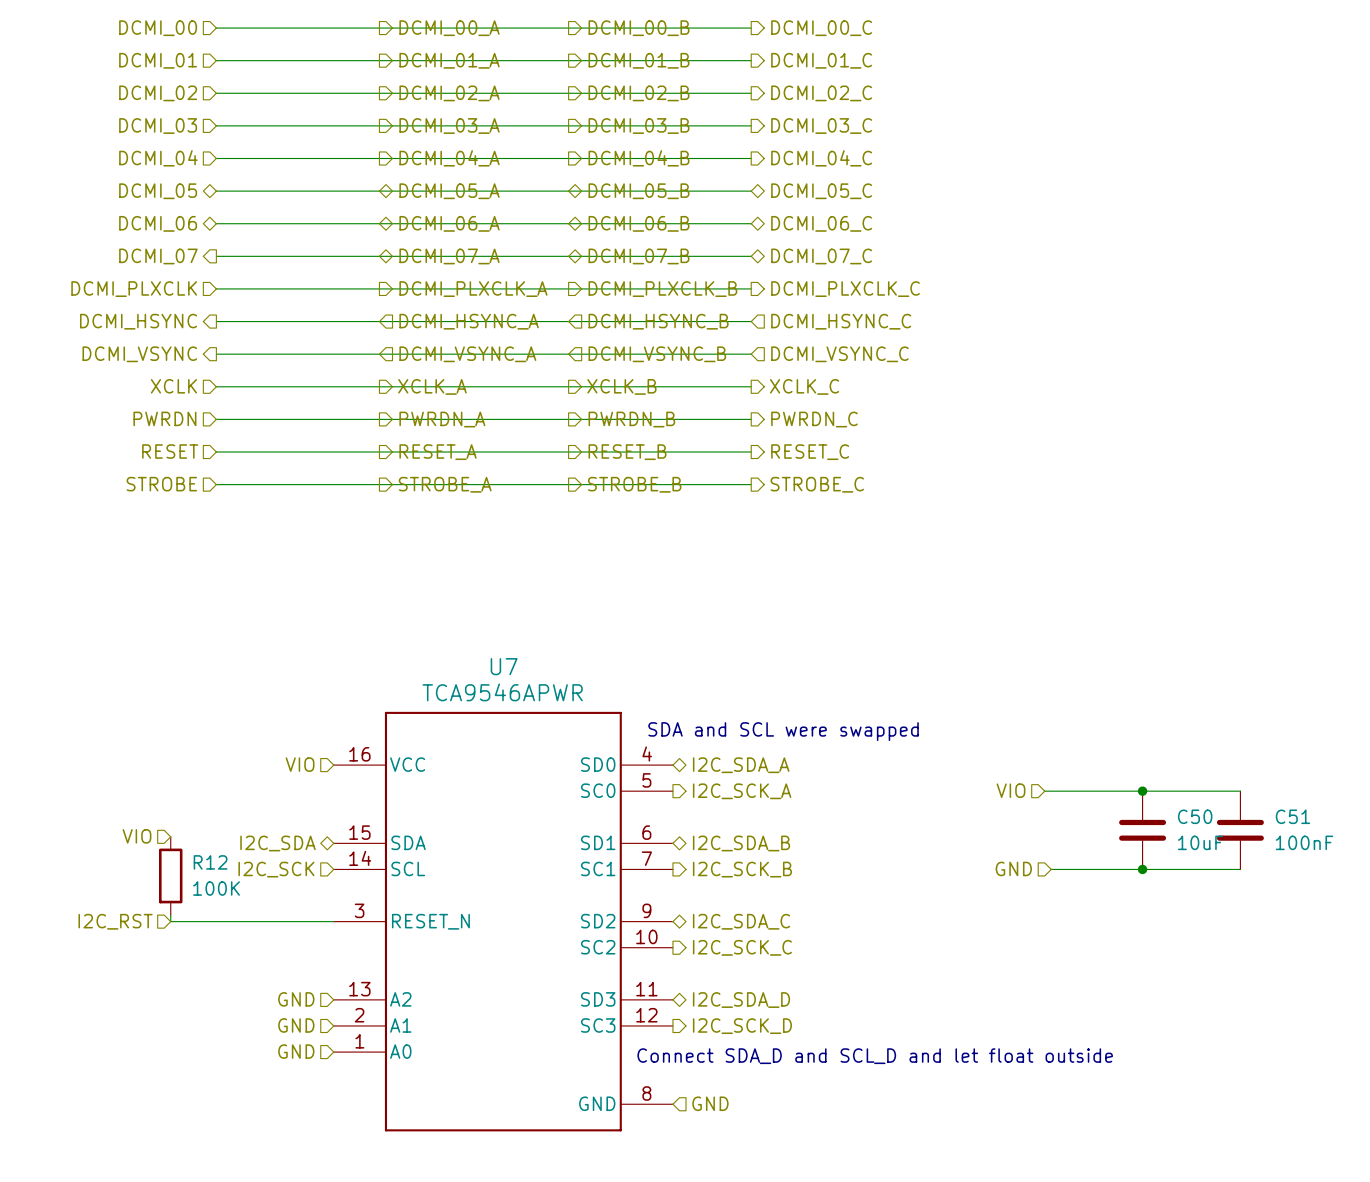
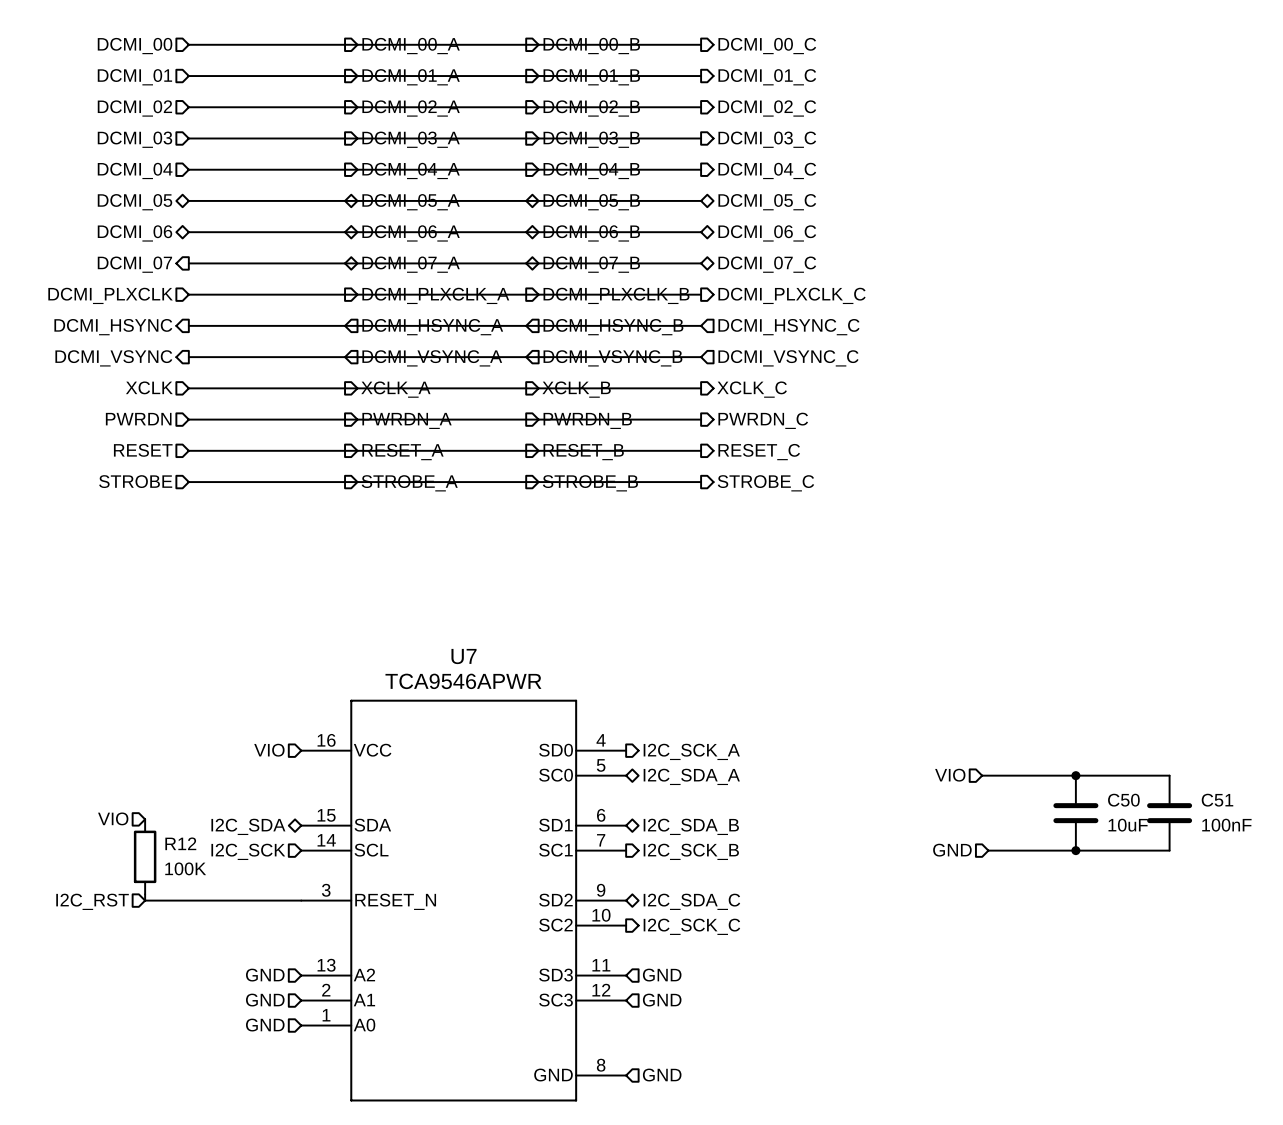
text: SDA and SCL were swapped (783, 731) -> none
hierarchical label shape: bidirectional (741, 765) -> output (691, 751)
hierarchical label: I2C_SDA_A (741, 765) -> I2C_SCK_A (691, 751)
hierarchical label shape: output (742, 791) -> bidirectional (691, 776)
hierarchical label: I2C_SCK_A (742, 791) -> I2C_SDA_A (691, 776)
hierarchical label shape: bidirectional (741, 1000) -> input (662, 975)
hierarchical label: I2C_SDA_D (741, 1000) -> GND (662, 975)
hierarchical label shape: output (742, 1026) -> input (662, 1000)
hierarchical label: I2C_SCK_D (742, 1026) -> GND (662, 1000)
text: Connect SDA_D and SCL_D and let float outside (875, 1056) -> none

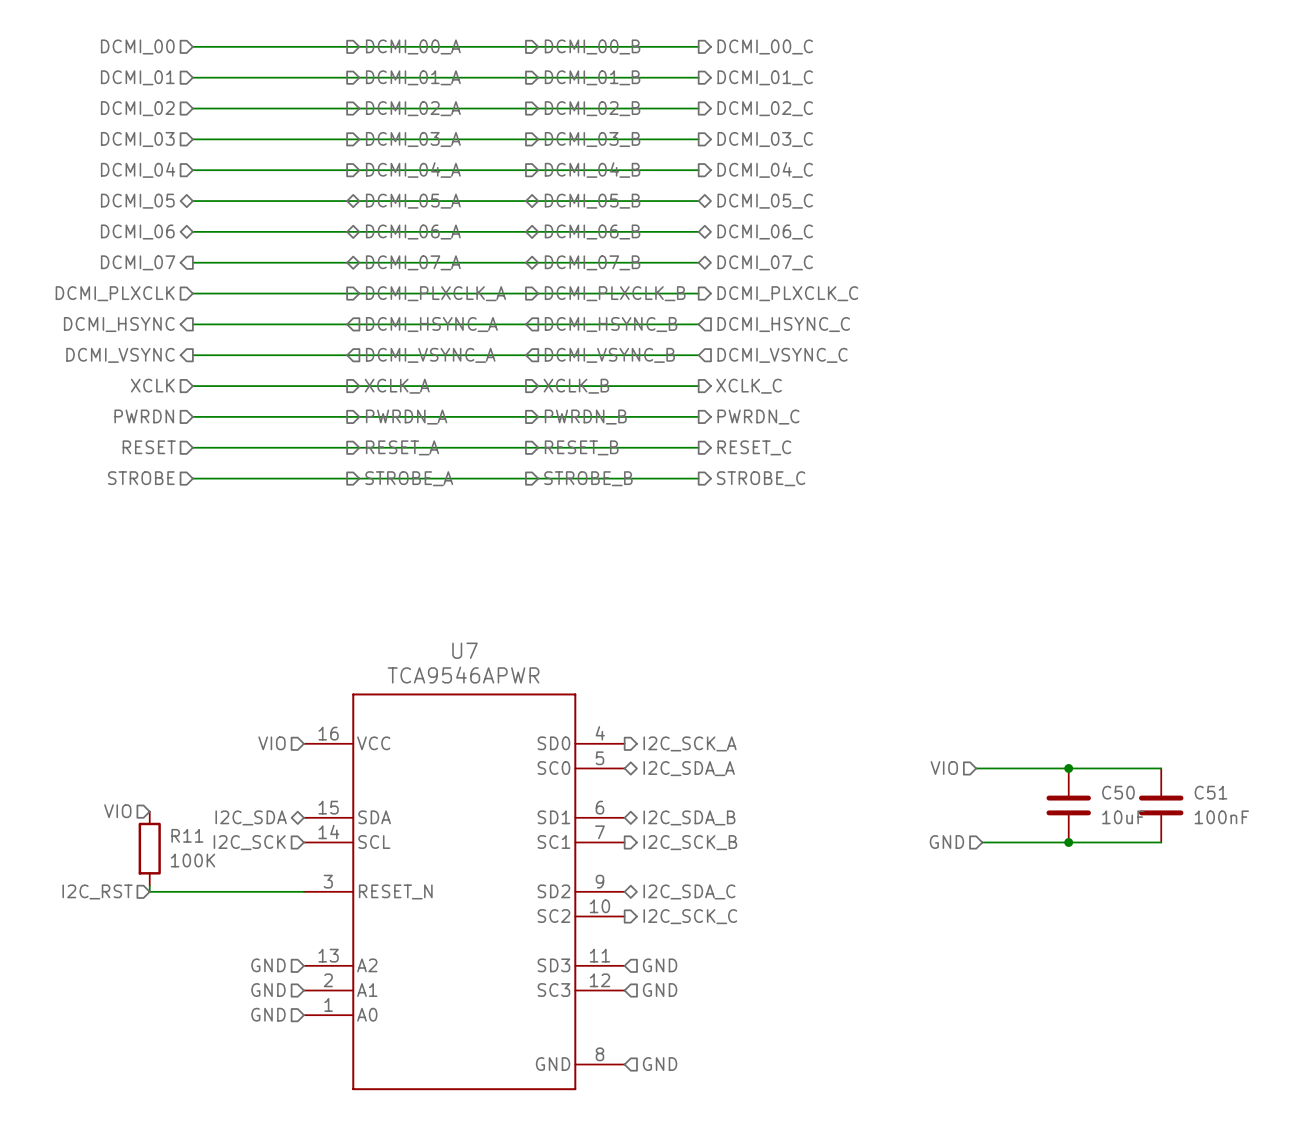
R12 name: R12 (180, 843) -> R11 (187, 835)

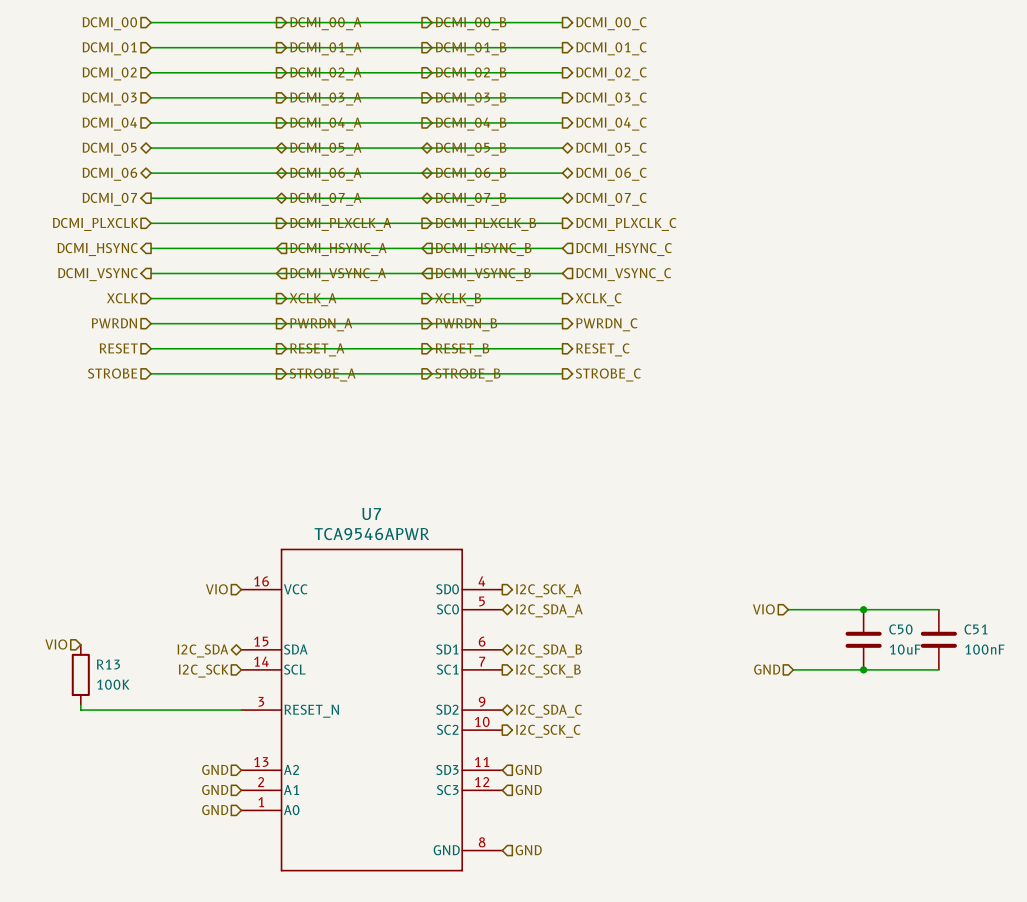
hierarchical label position: VIO (117, 811) -> VIO (56, 644)
R13: none -> 100K (80, 674)
R11: 100K (149, 848) -> none
wire: (149, 885) (149, 891) -> (80, 705) (80, 710) (115, 710)
hierarchical label: I2C_RST (97, 891) -> none

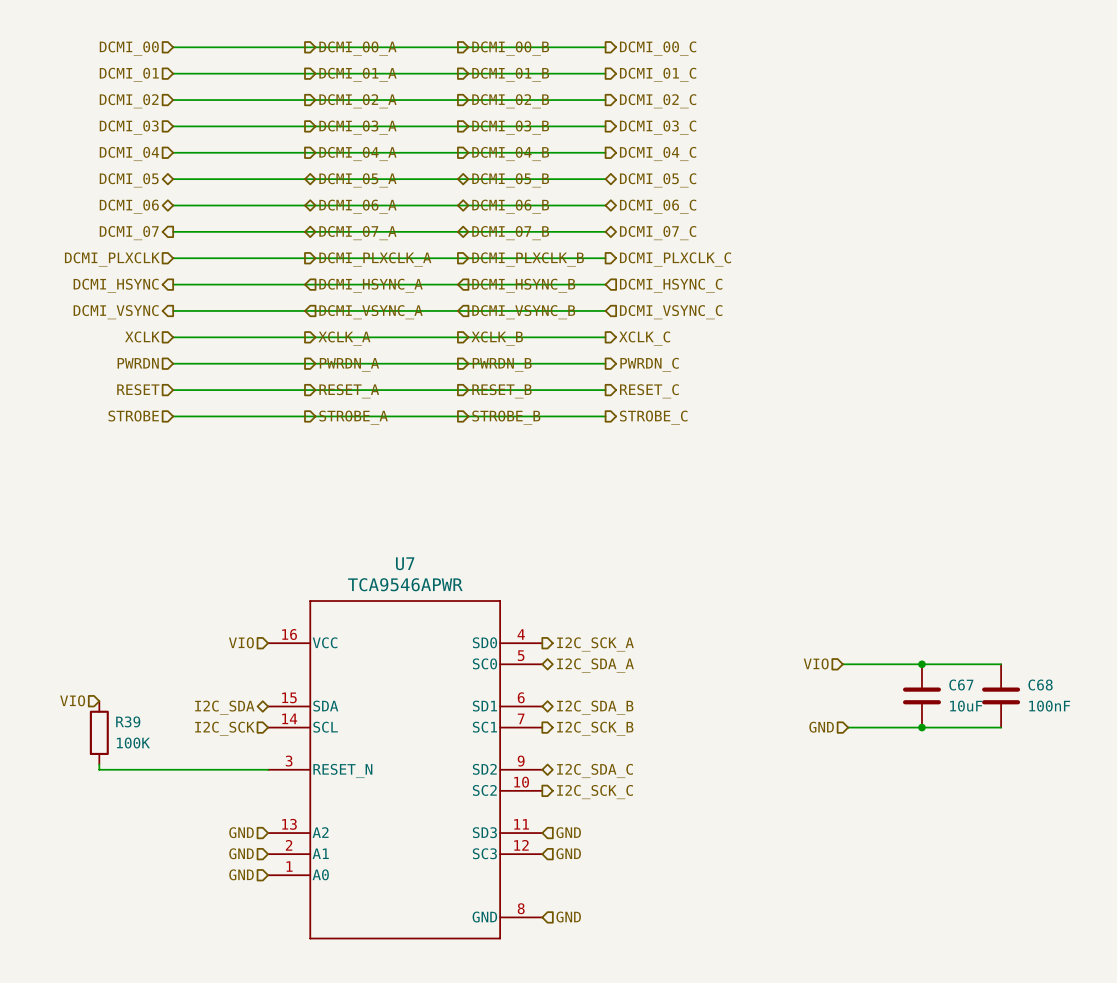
C50 name: C50 (900, 629) -> C67 (961, 685)
C51 name: C51 (975, 629) -> C68 (1040, 685)
R13 name: R13 (108, 664) -> R39 (128, 721)

